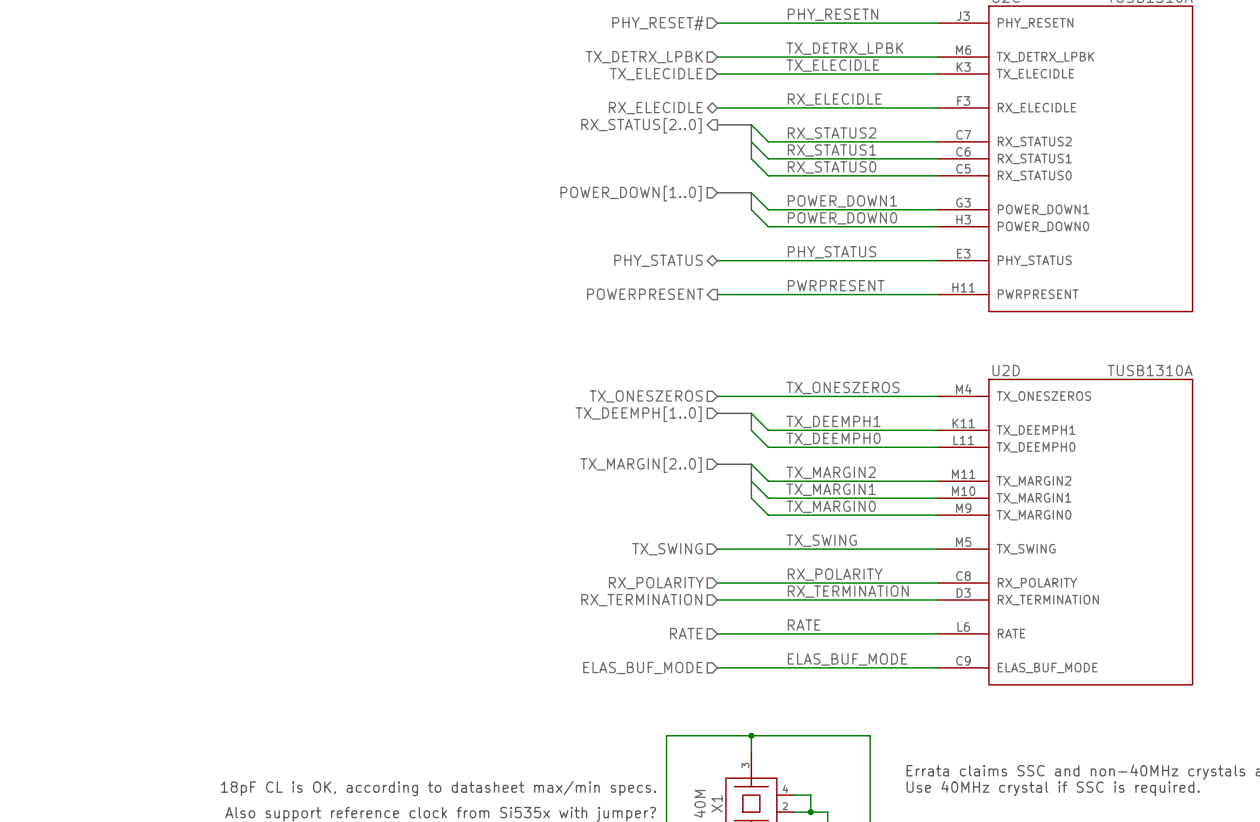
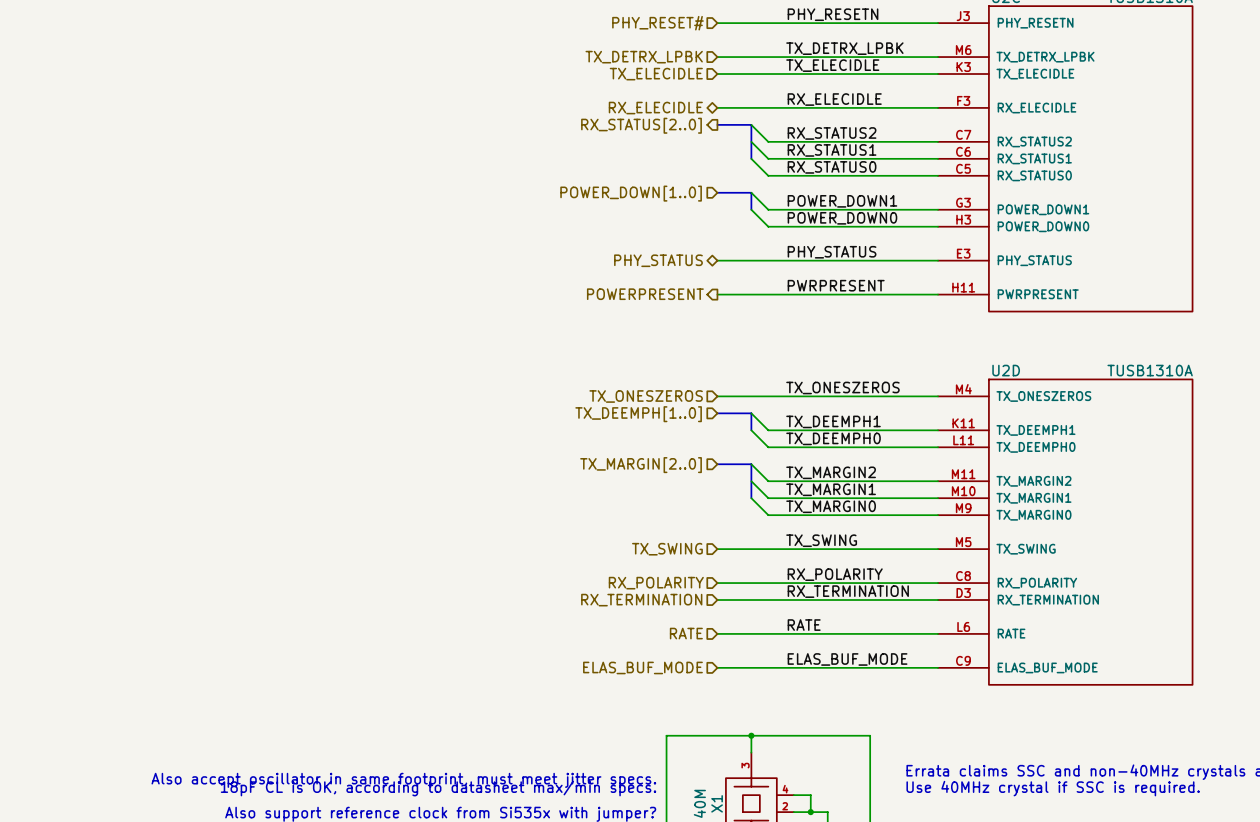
text: none -> Also accept oscillator in same footprint, must meet jitter specs. (403, 780)

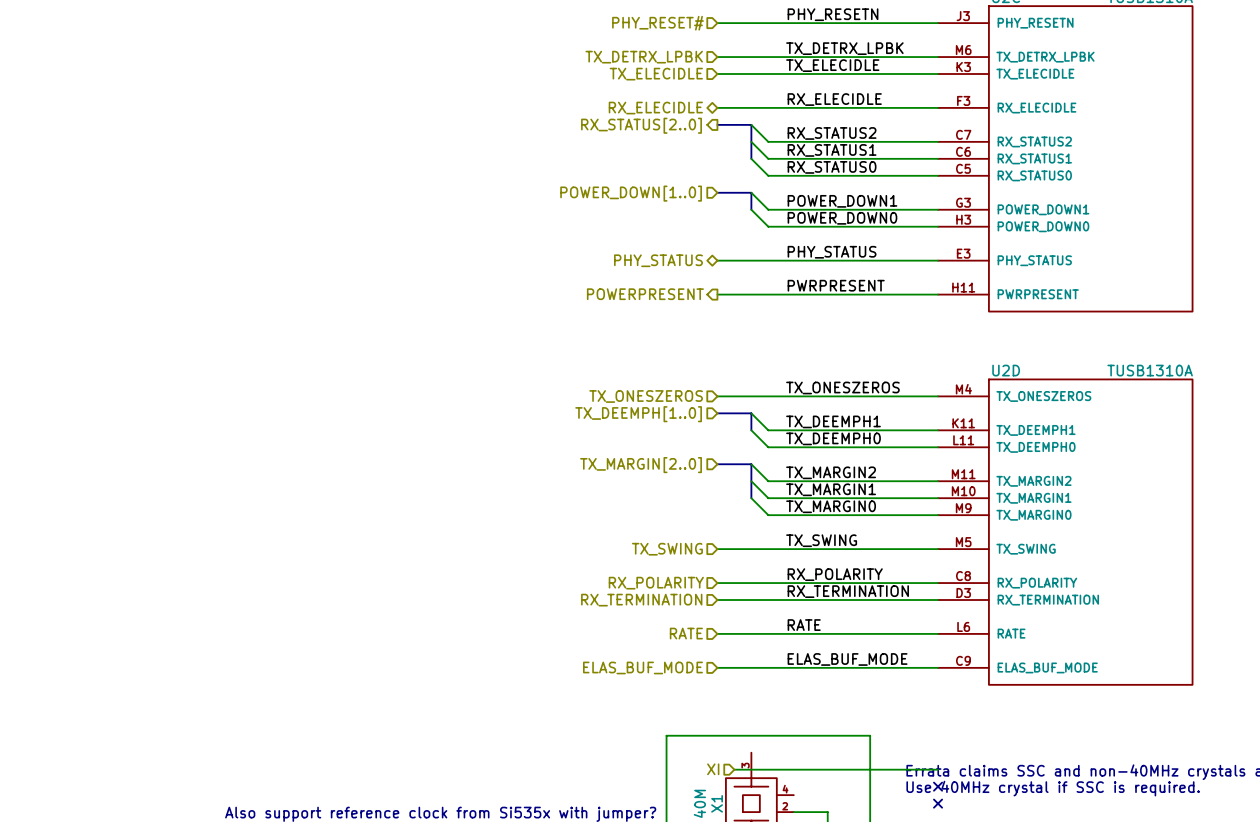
wire: (751, 735) (751, 752) -> none
junction: (751, 735) -> none
hierarchical label: none -> XI (713, 769)
wire: none -> (734, 769) (938, 769)
text: Also accept oscillator in same footprint, must meet jitter specs. (403, 780) -> none
no-connect mark: none -> (938, 786)
text: 18pF CL is OK, according to datasheet max/min specs. (438, 788) -> none
wire: (793, 795) (810, 795) (810, 812) -> none
no-connect mark: none -> (938, 803)
junction: (810, 812) -> none

